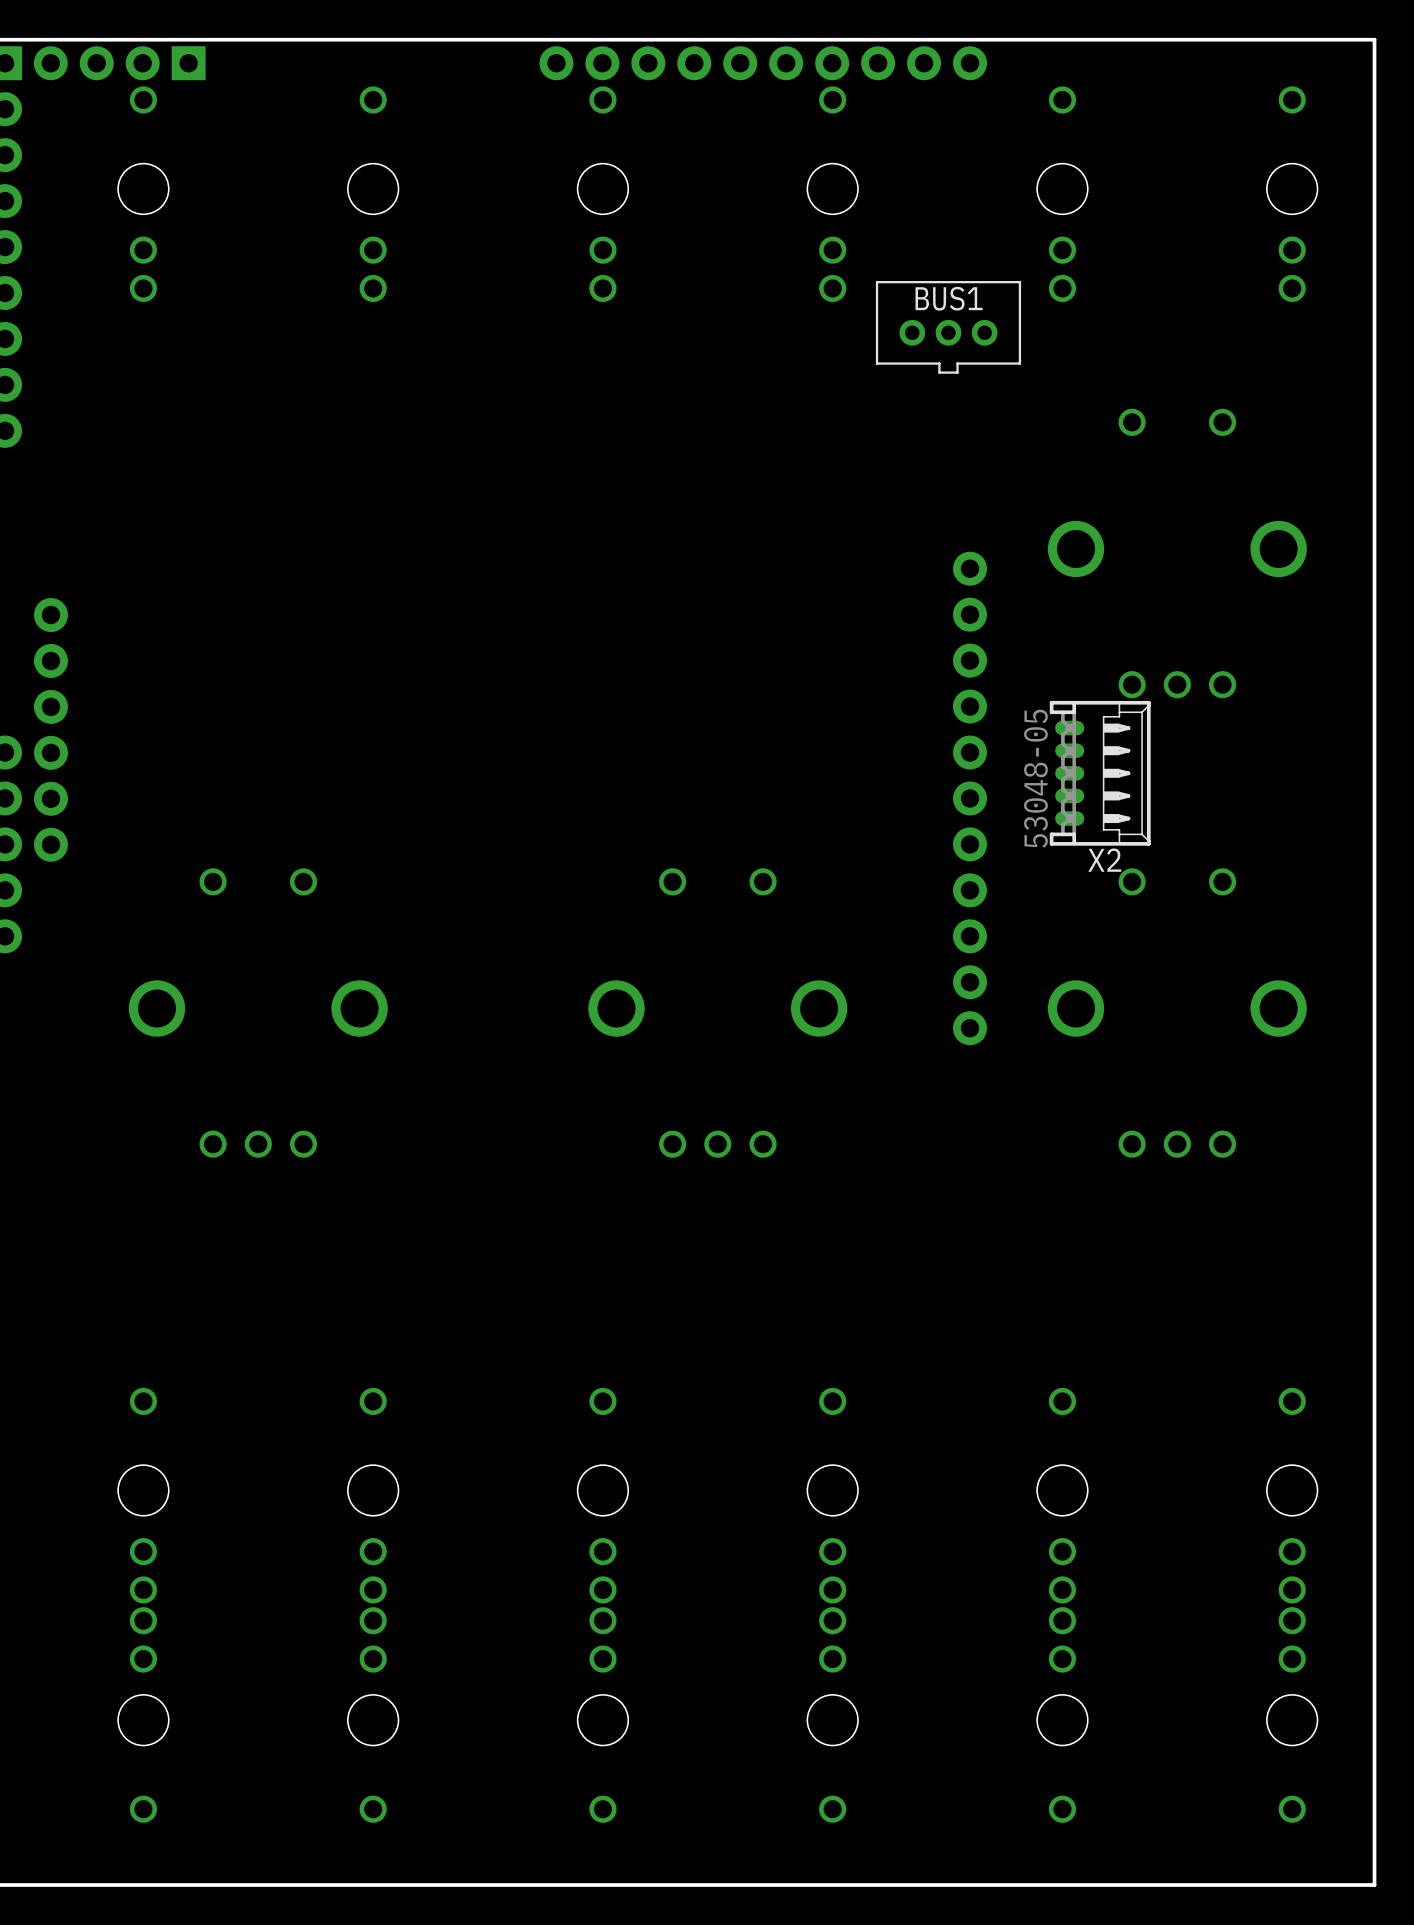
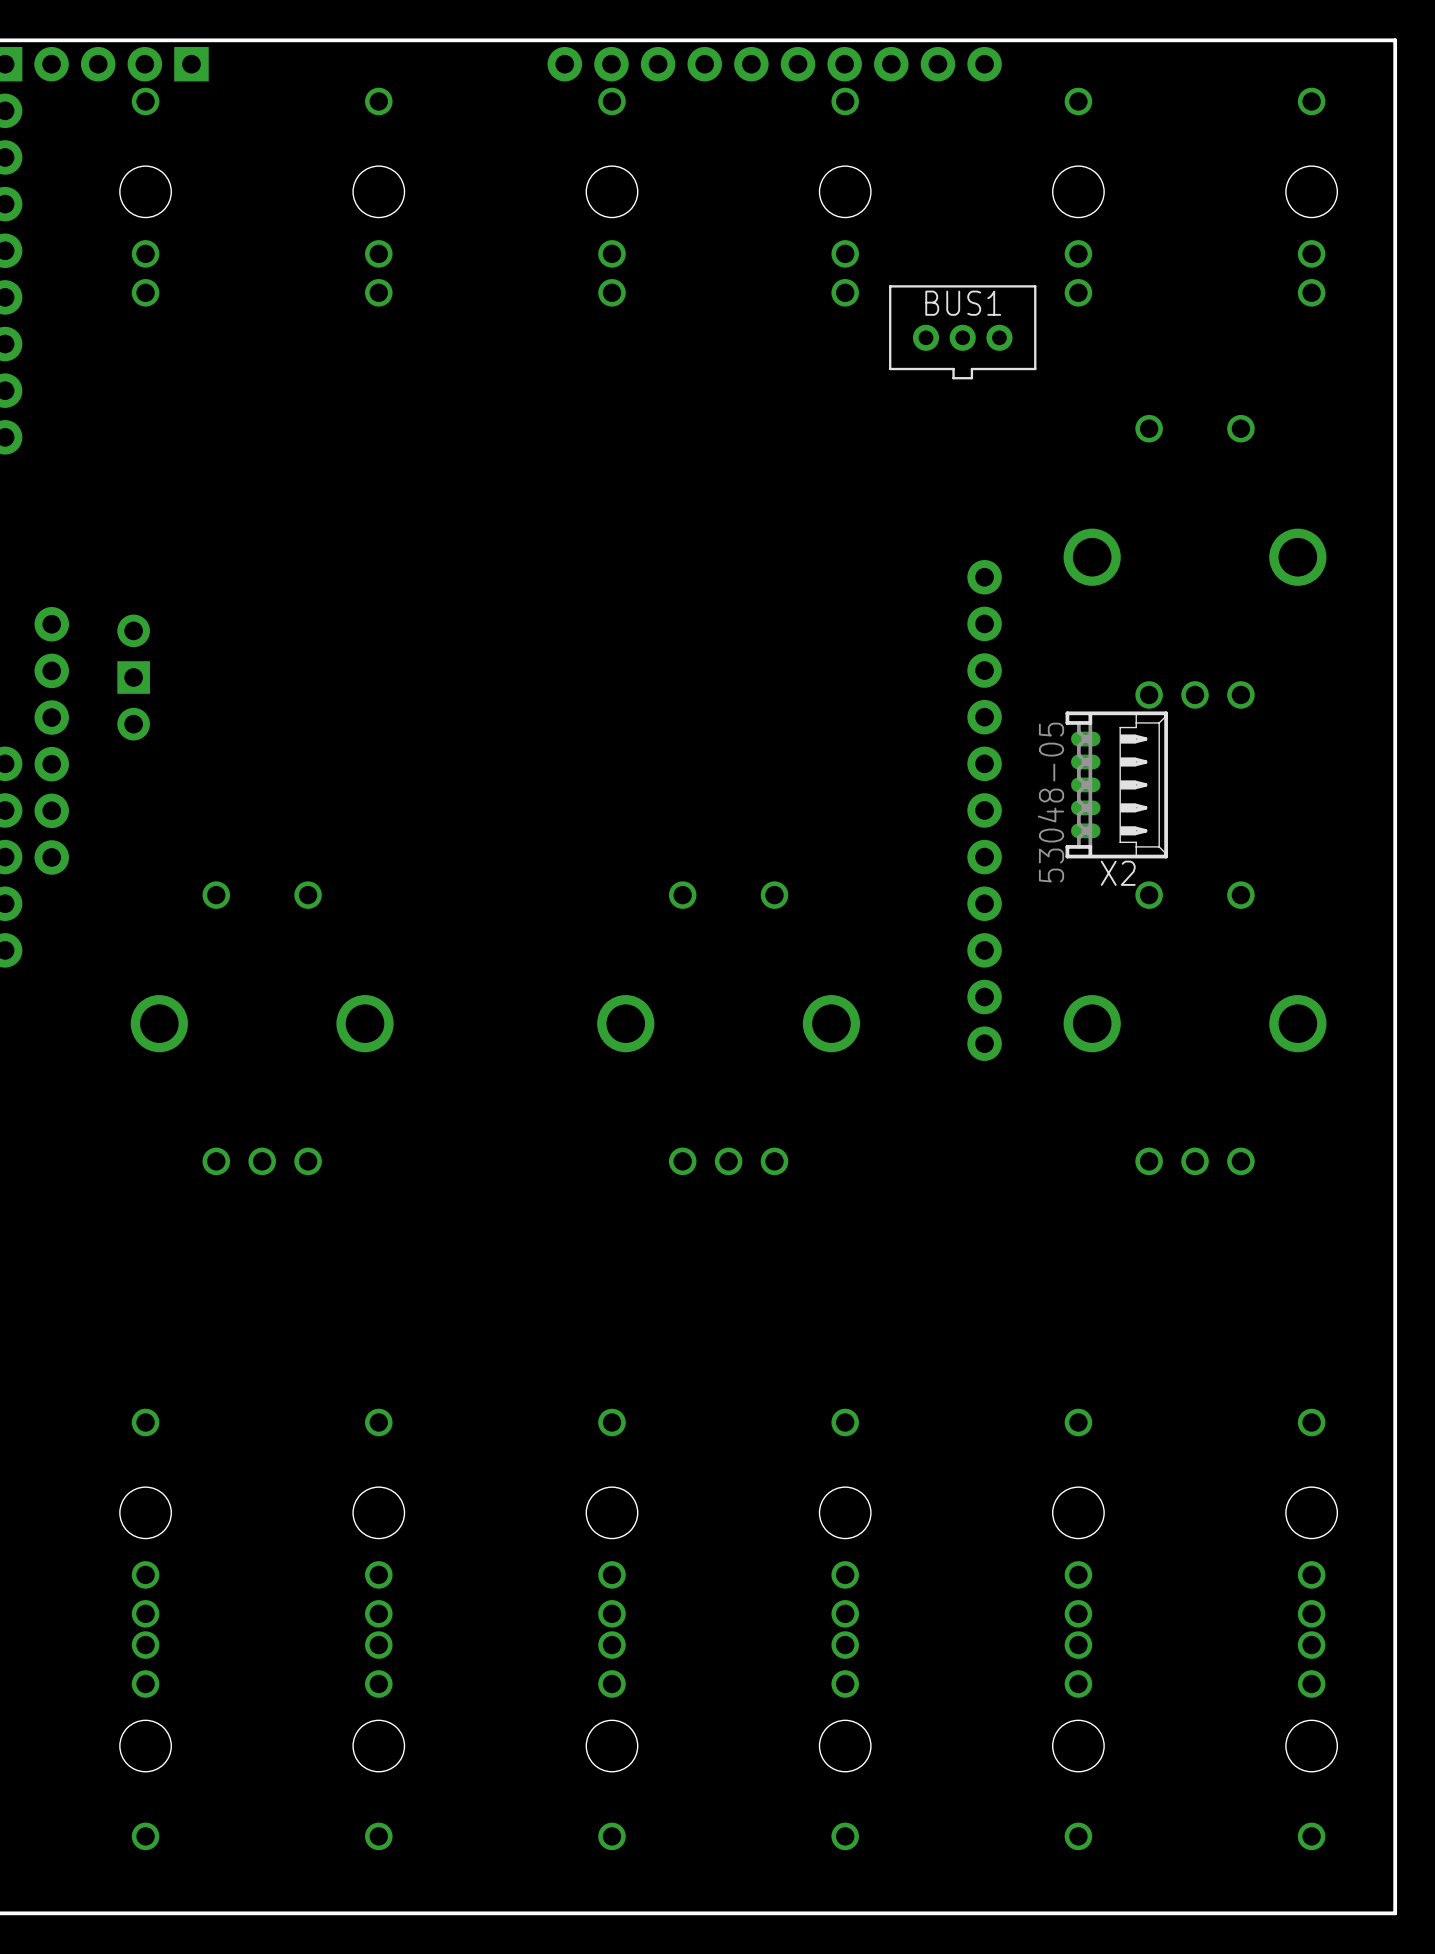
part: none -> (133, 677)

